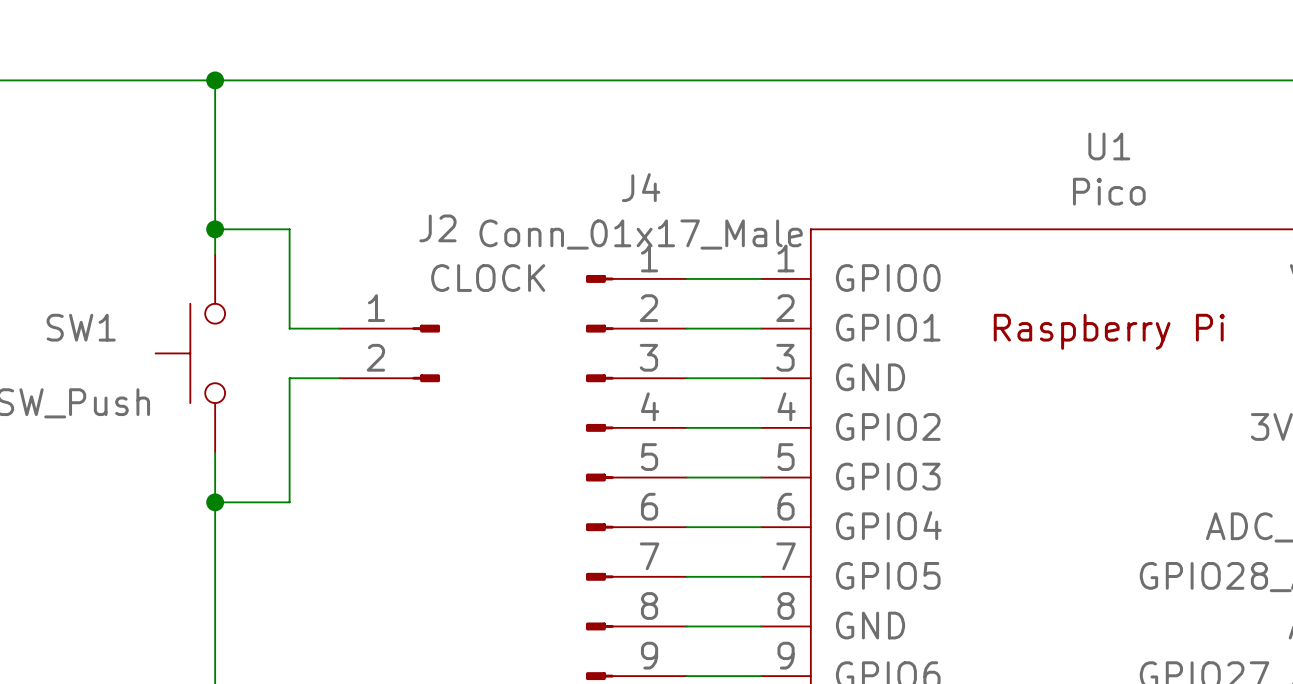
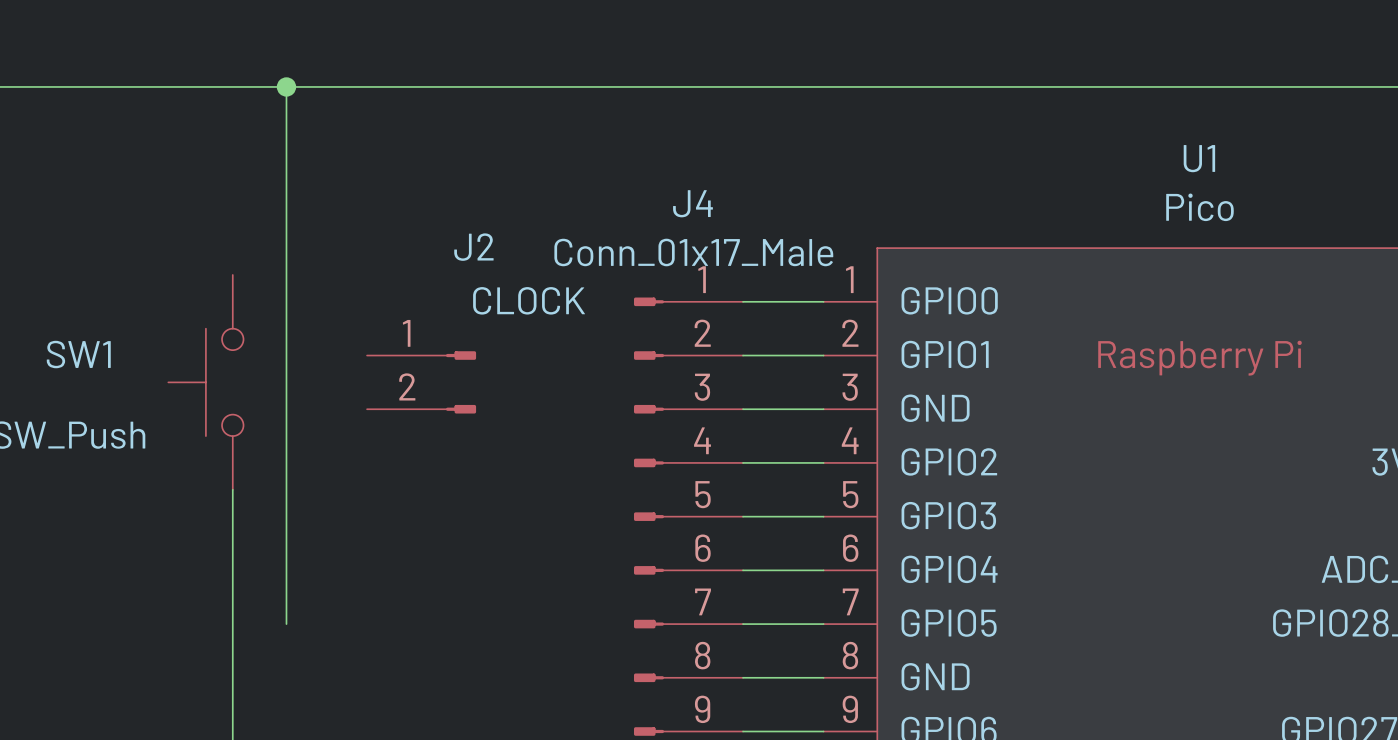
wire: (215, 80) (215, 254) -> none
junction position: (215, 80) -> (286, 86)
wire: none -> (286, 86) (286, 624)
wire: (215, 229) (289, 229) (289, 328) (339, 328) -> none
junction: (215, 229) -> none
wire: (339, 378) (289, 378) (289, 502) (215, 502) -> none
junction: (215, 502) -> none

